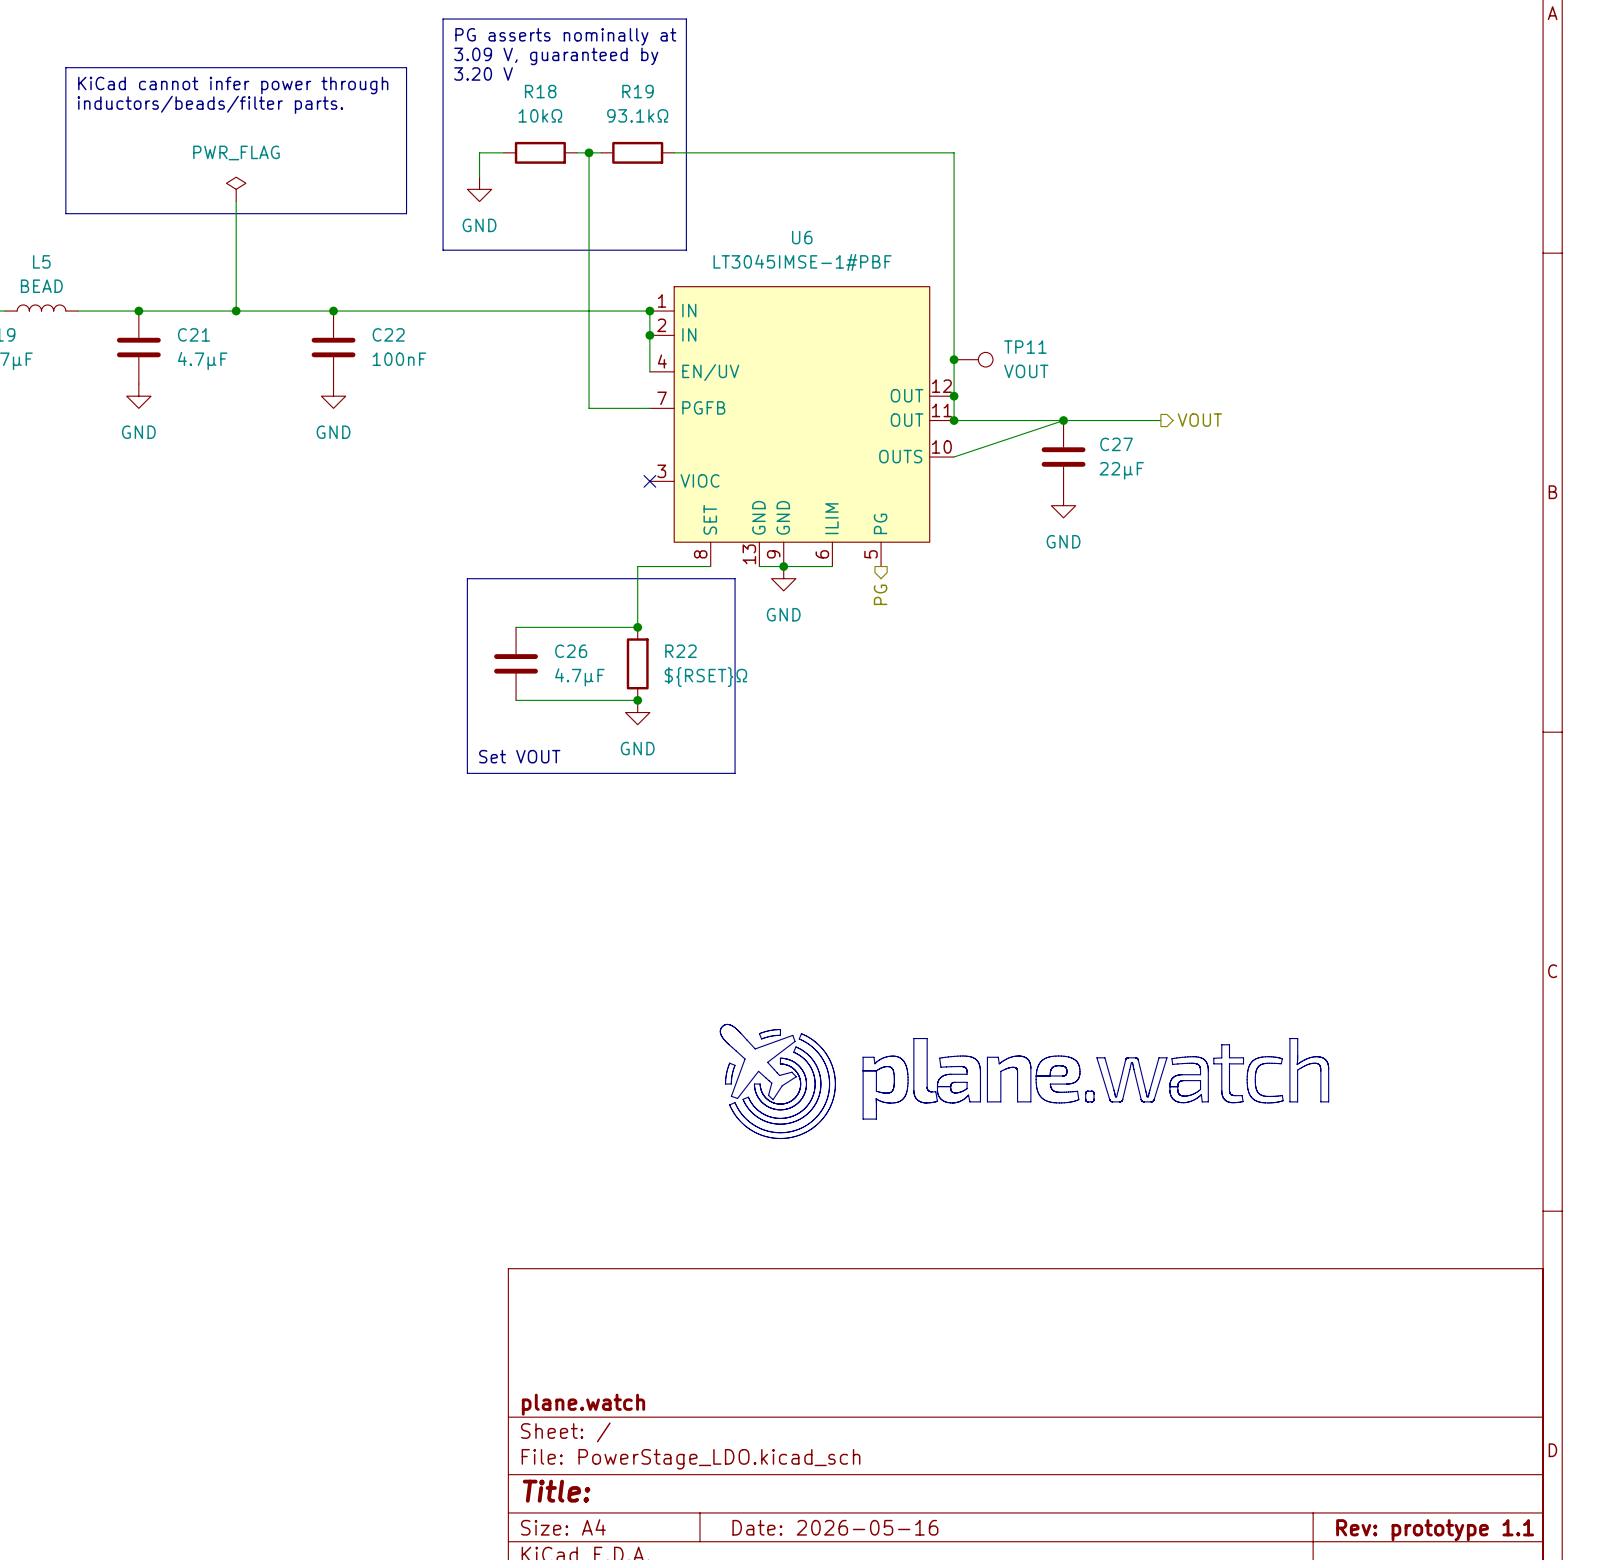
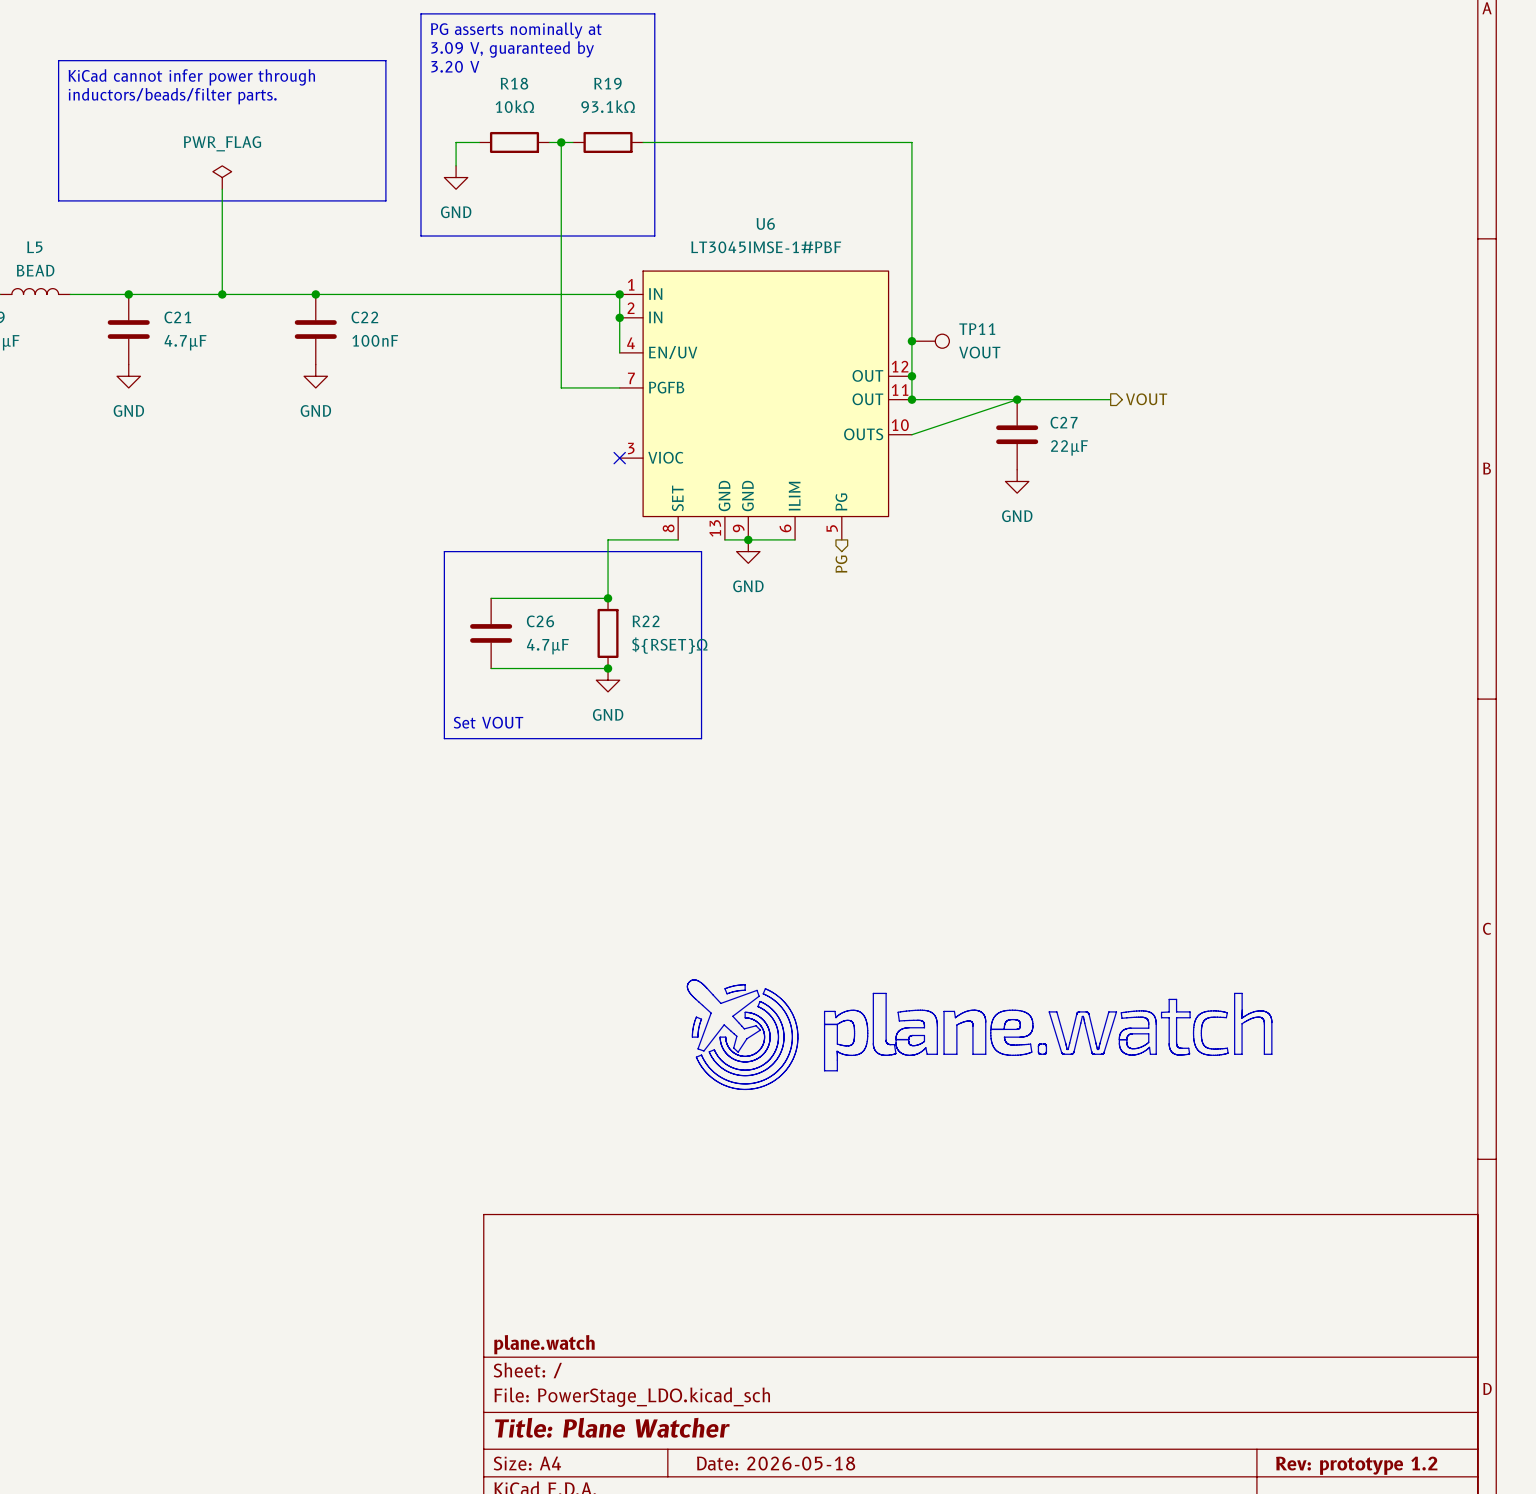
title block: Title: (556, 1491) -> Title: Plane Watcher (612, 1427)
title block: Date: 2026-05-16 (835, 1527) -> Date: 2026-05-18 (776, 1463)
title block: Rev: prototype 1.1 (1435, 1530) -> Rev: prototype 1.2 (1356, 1465)

